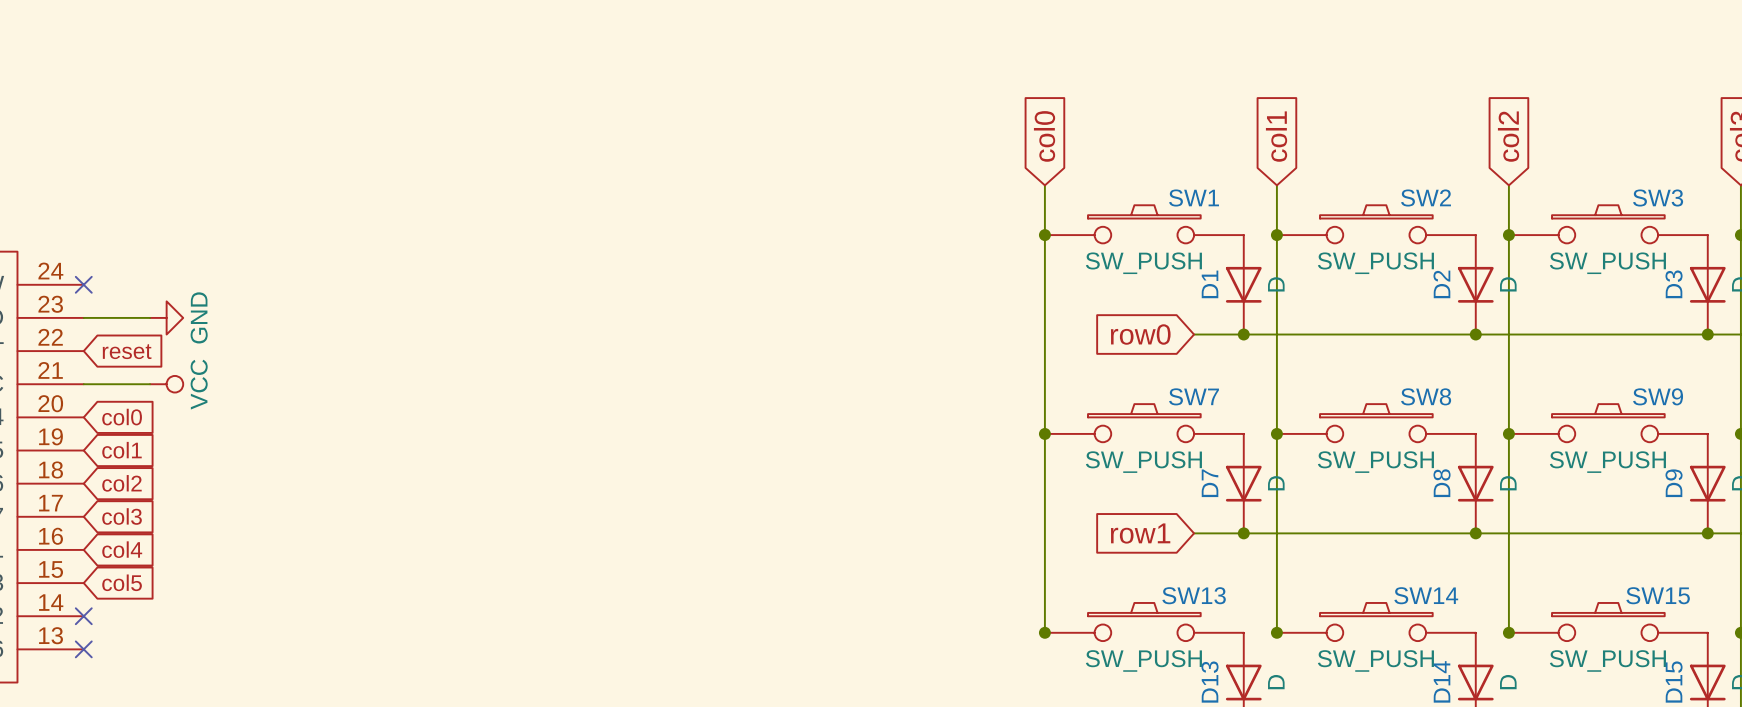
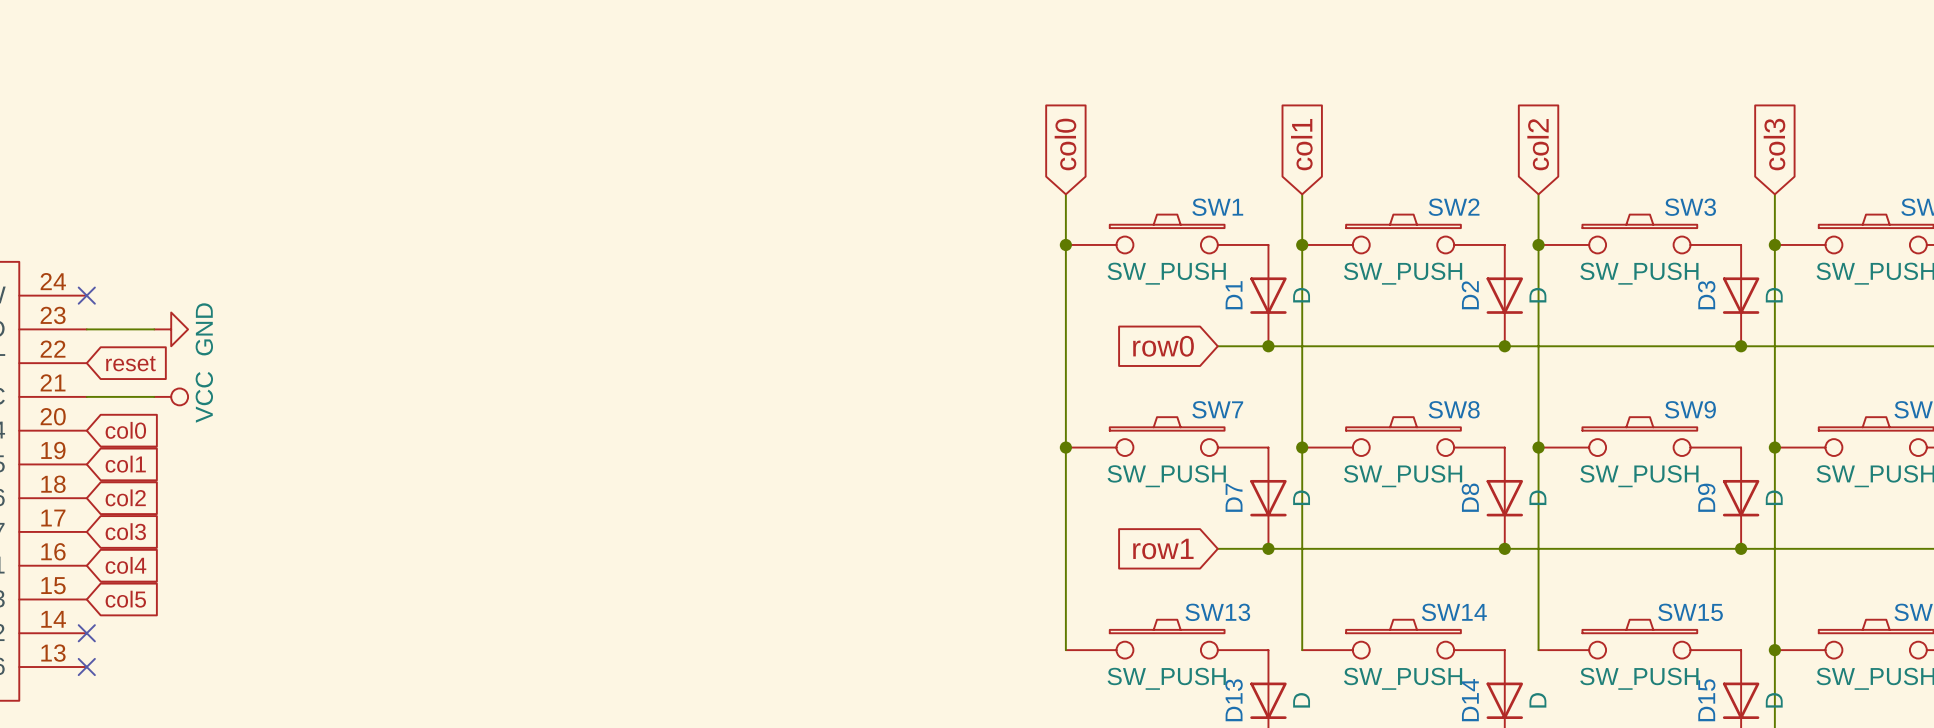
junction: (1044, 632) -> none
junction: (1276, 632) -> none
junction: (1508, 632) -> none

